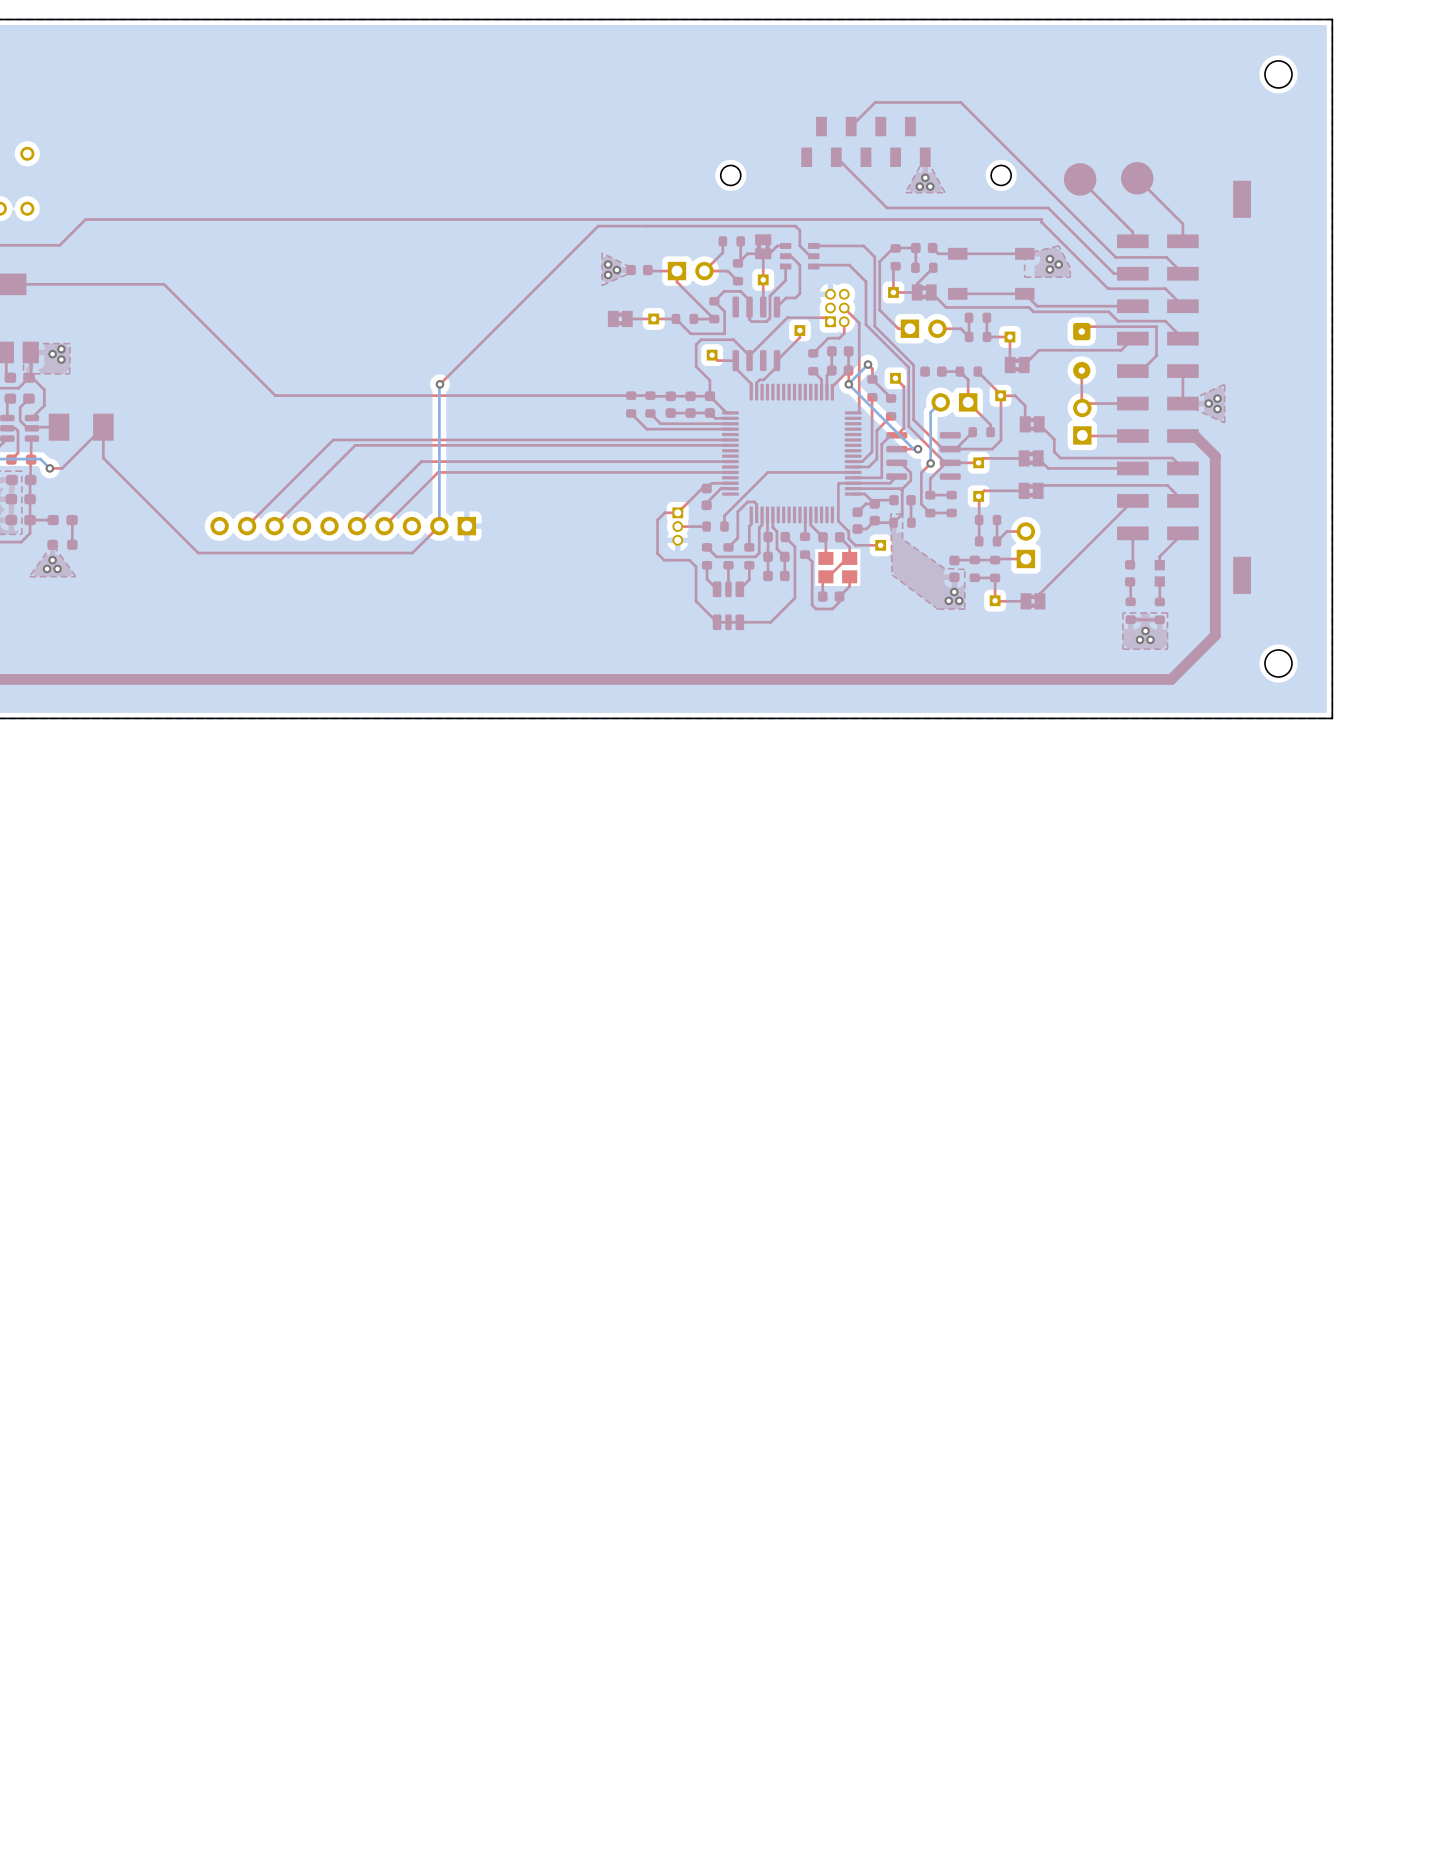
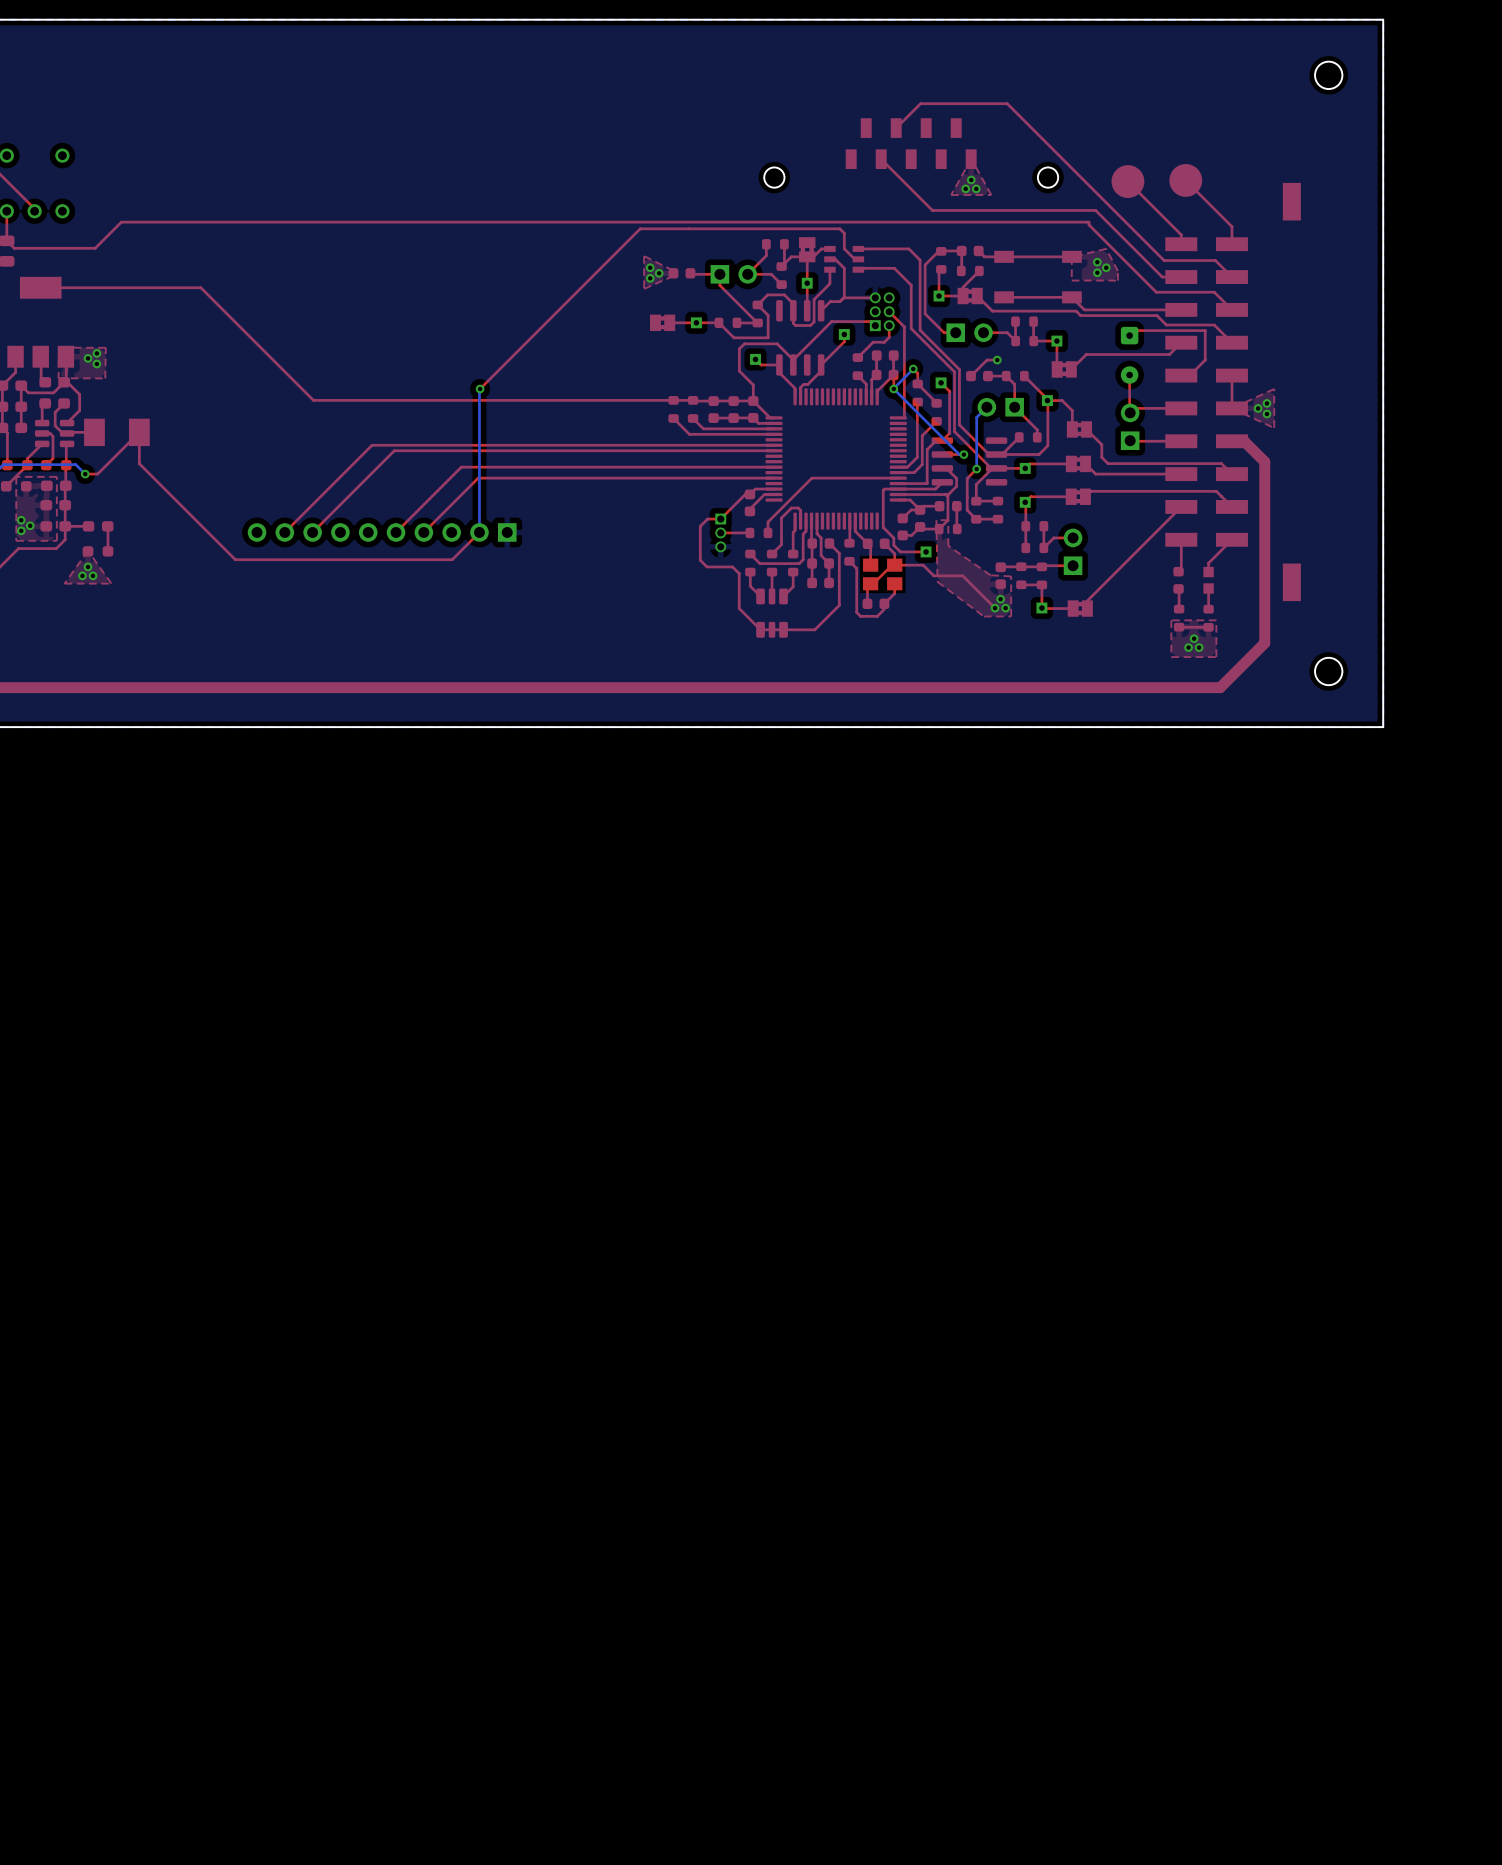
top track: none -> (875, 297) (843, 297)
top track: none -> (997, 360) (987, 360) (971, 376)
via: none -> (997, 360)
top track: none -> (894, 565) (923, 565) (933, 575) (962, 575) (995, 608)

